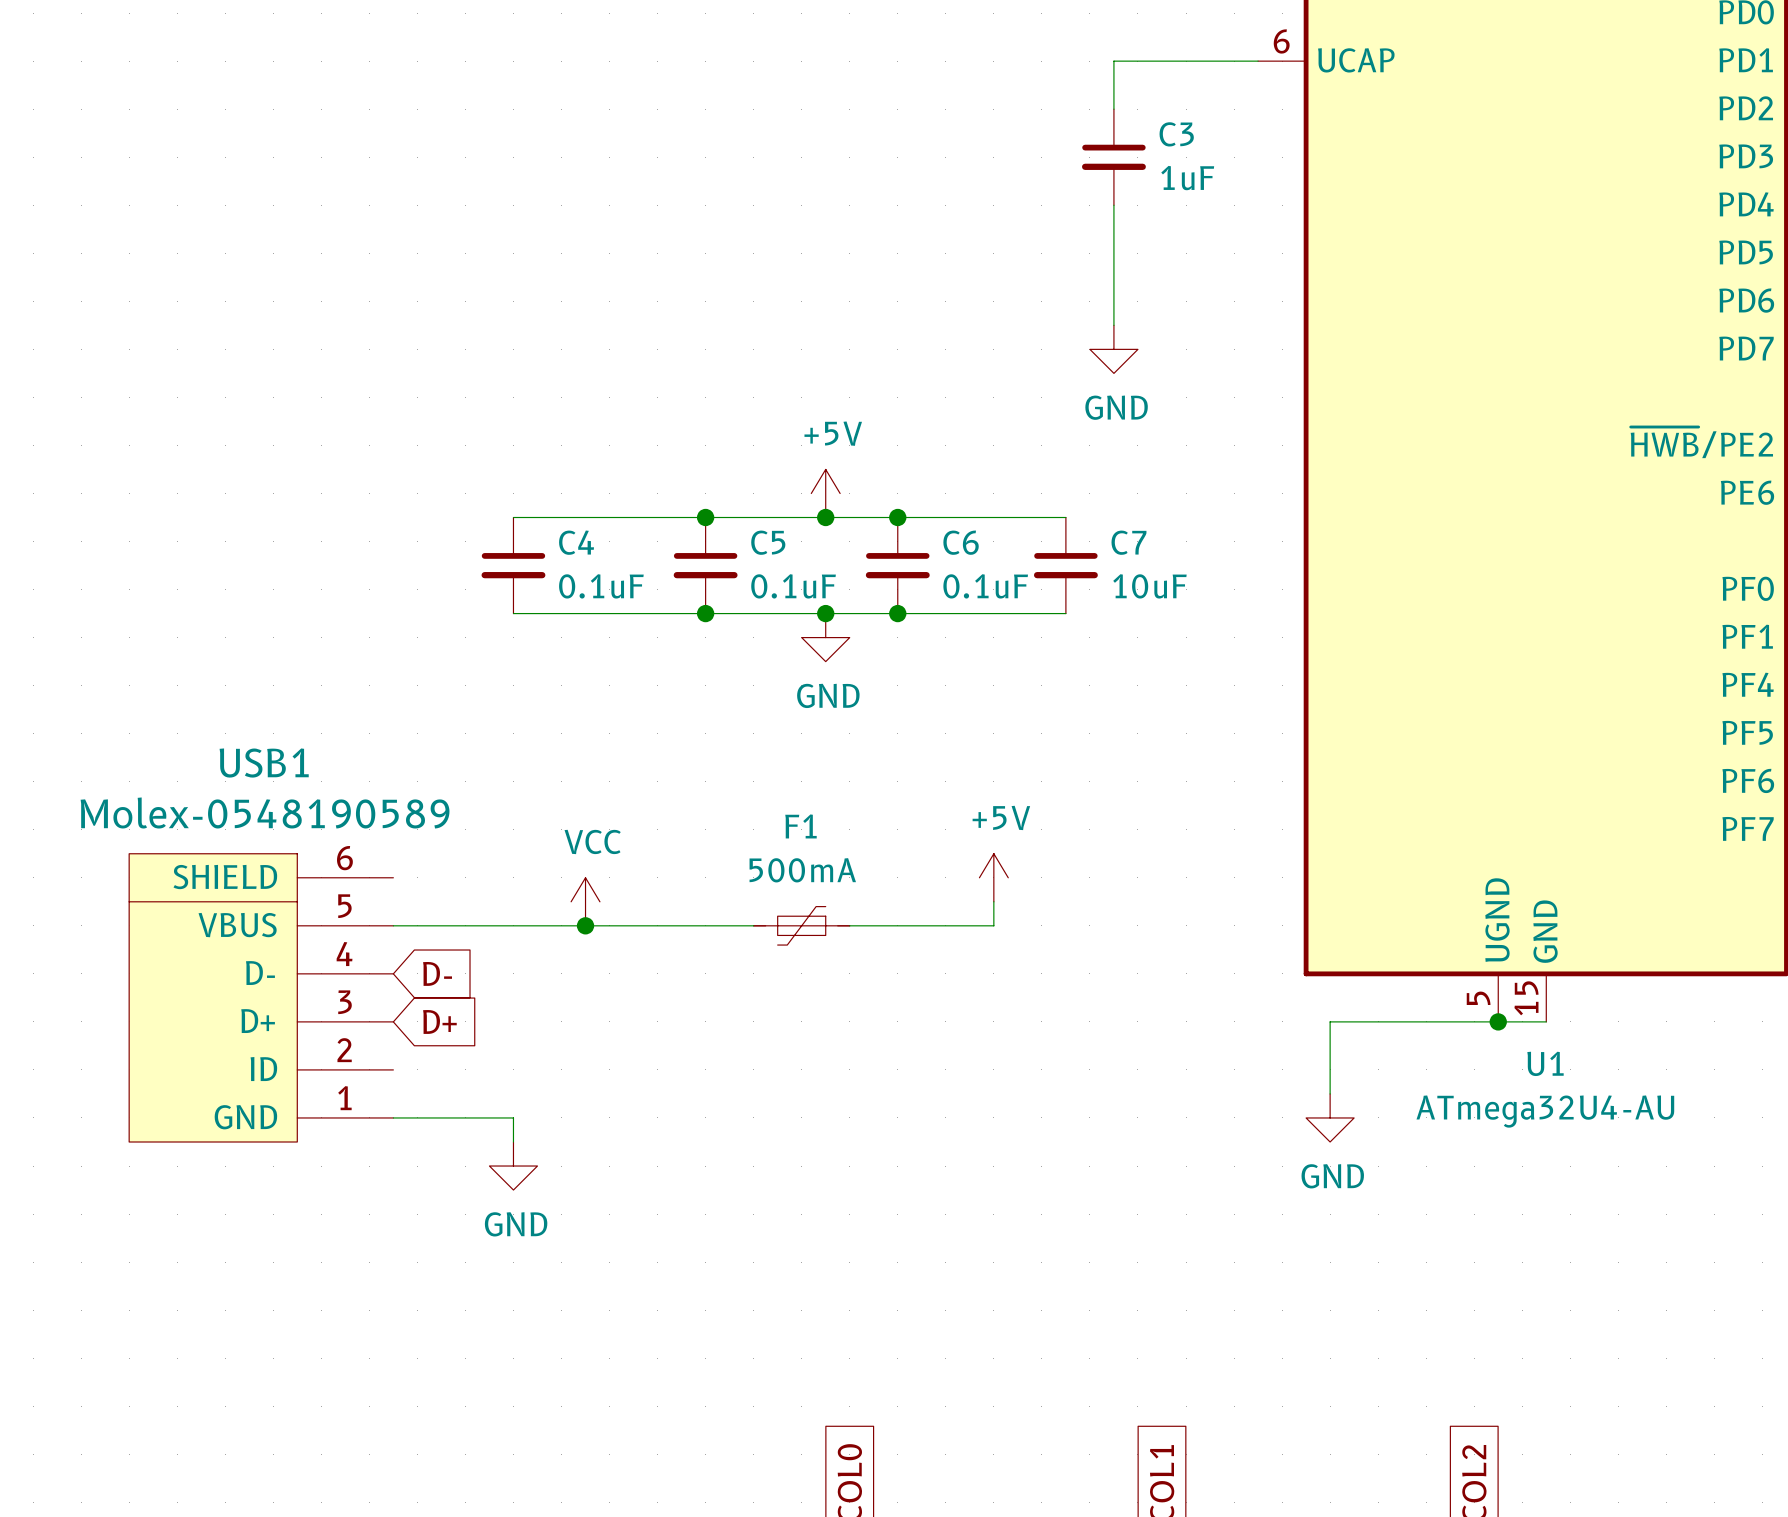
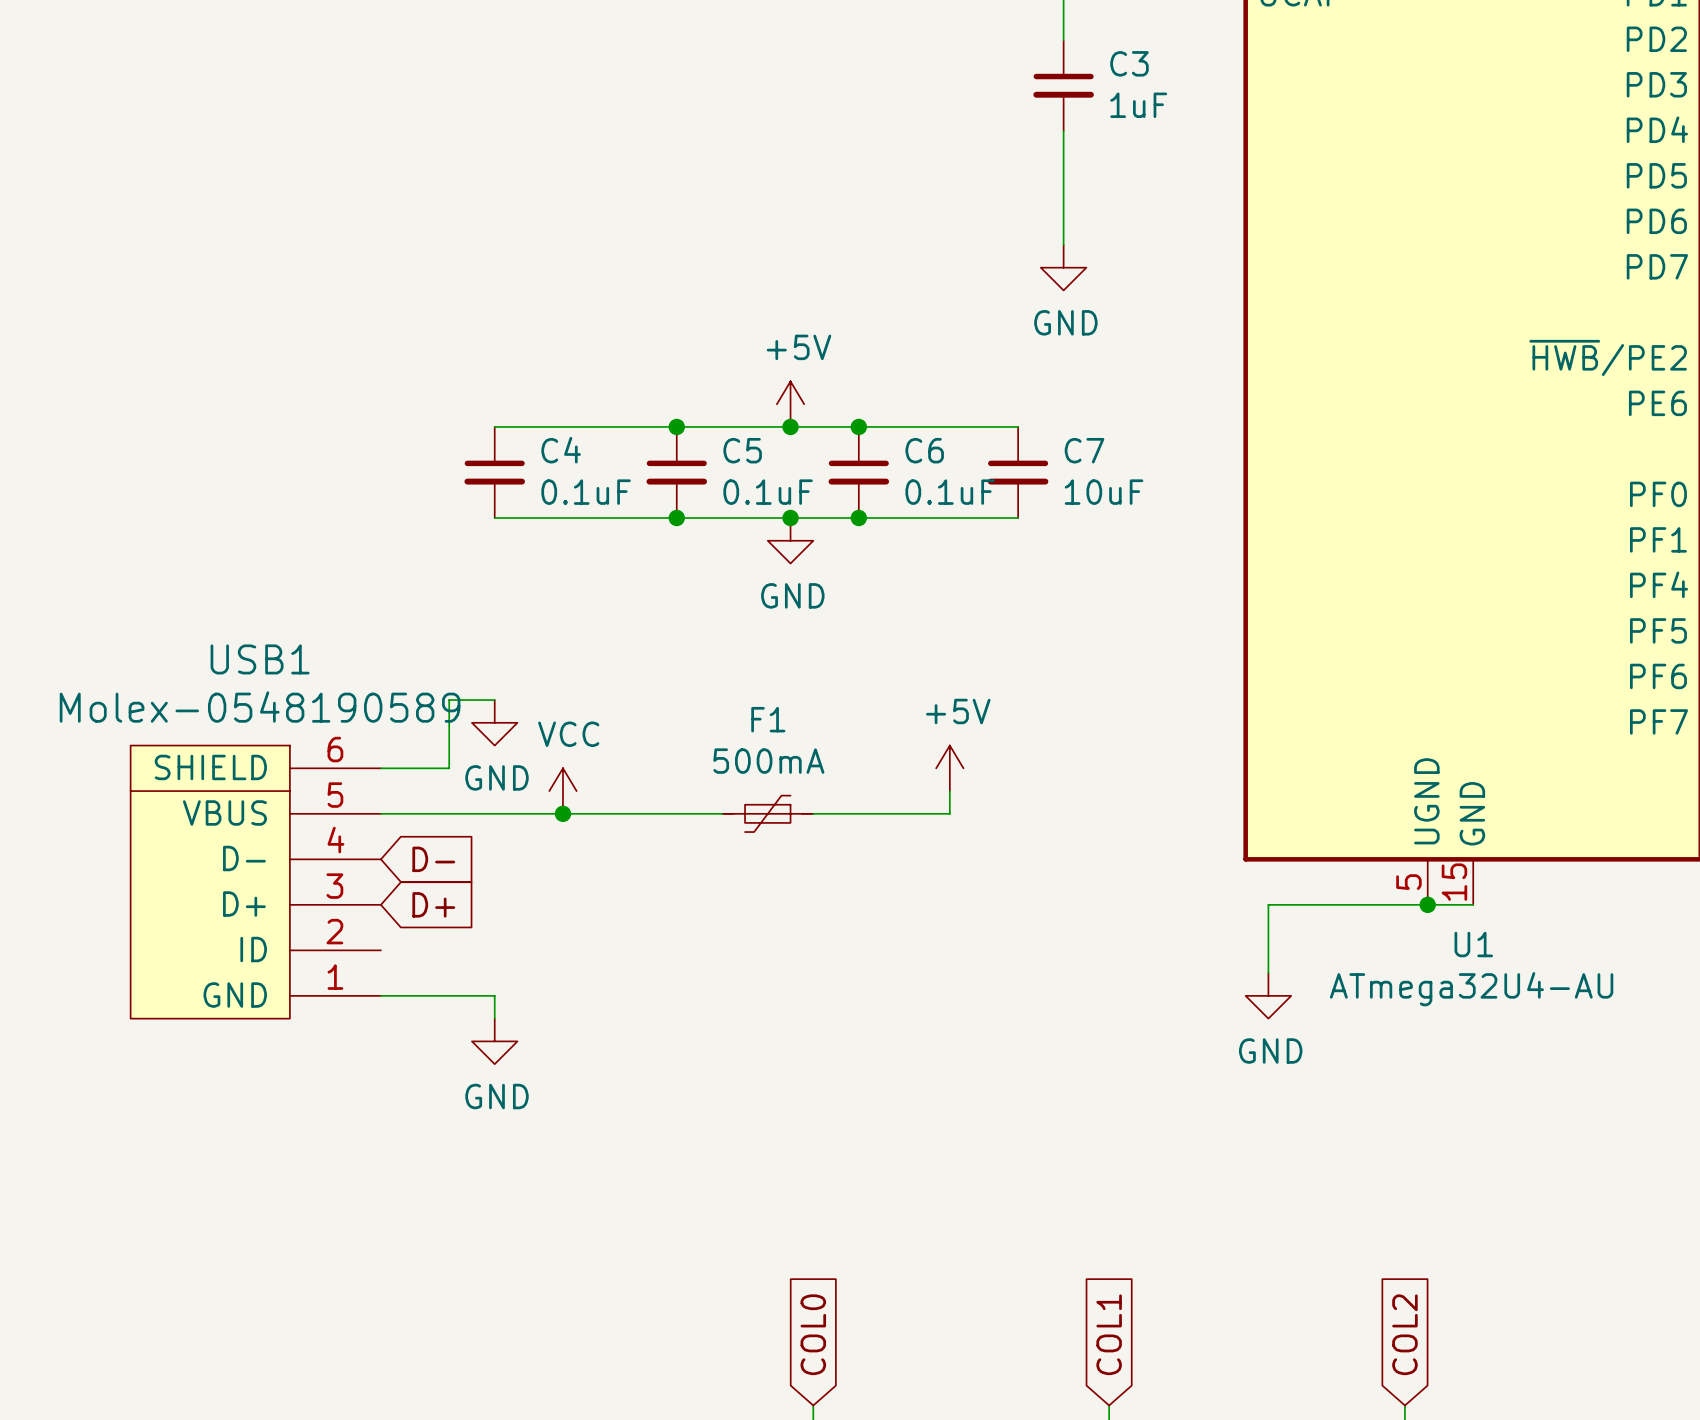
wire: none -> (494, 700) (449, 700) (449, 768) (380, 768)
power symbol: none -> GND (494, 722)

